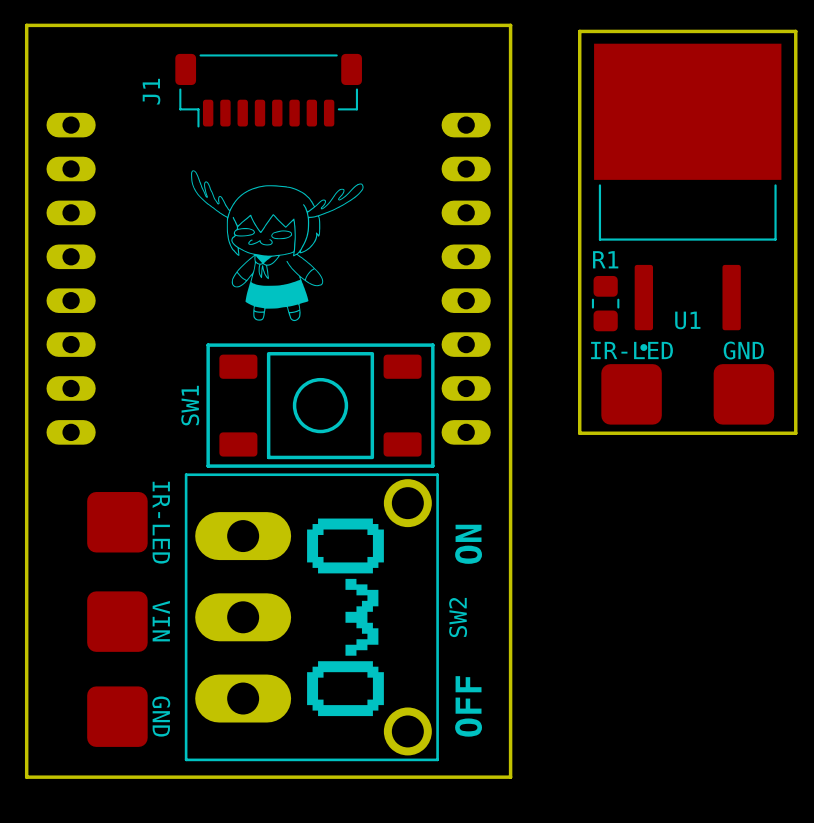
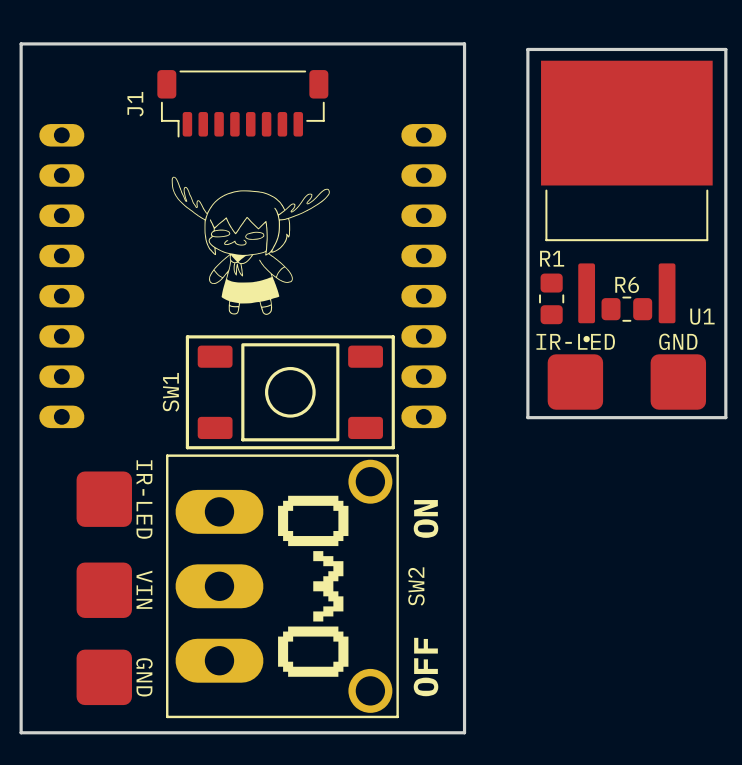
R6: none -> (626, 309)
U1 name position: U1 (687, 320) -> U1 (702, 316)

